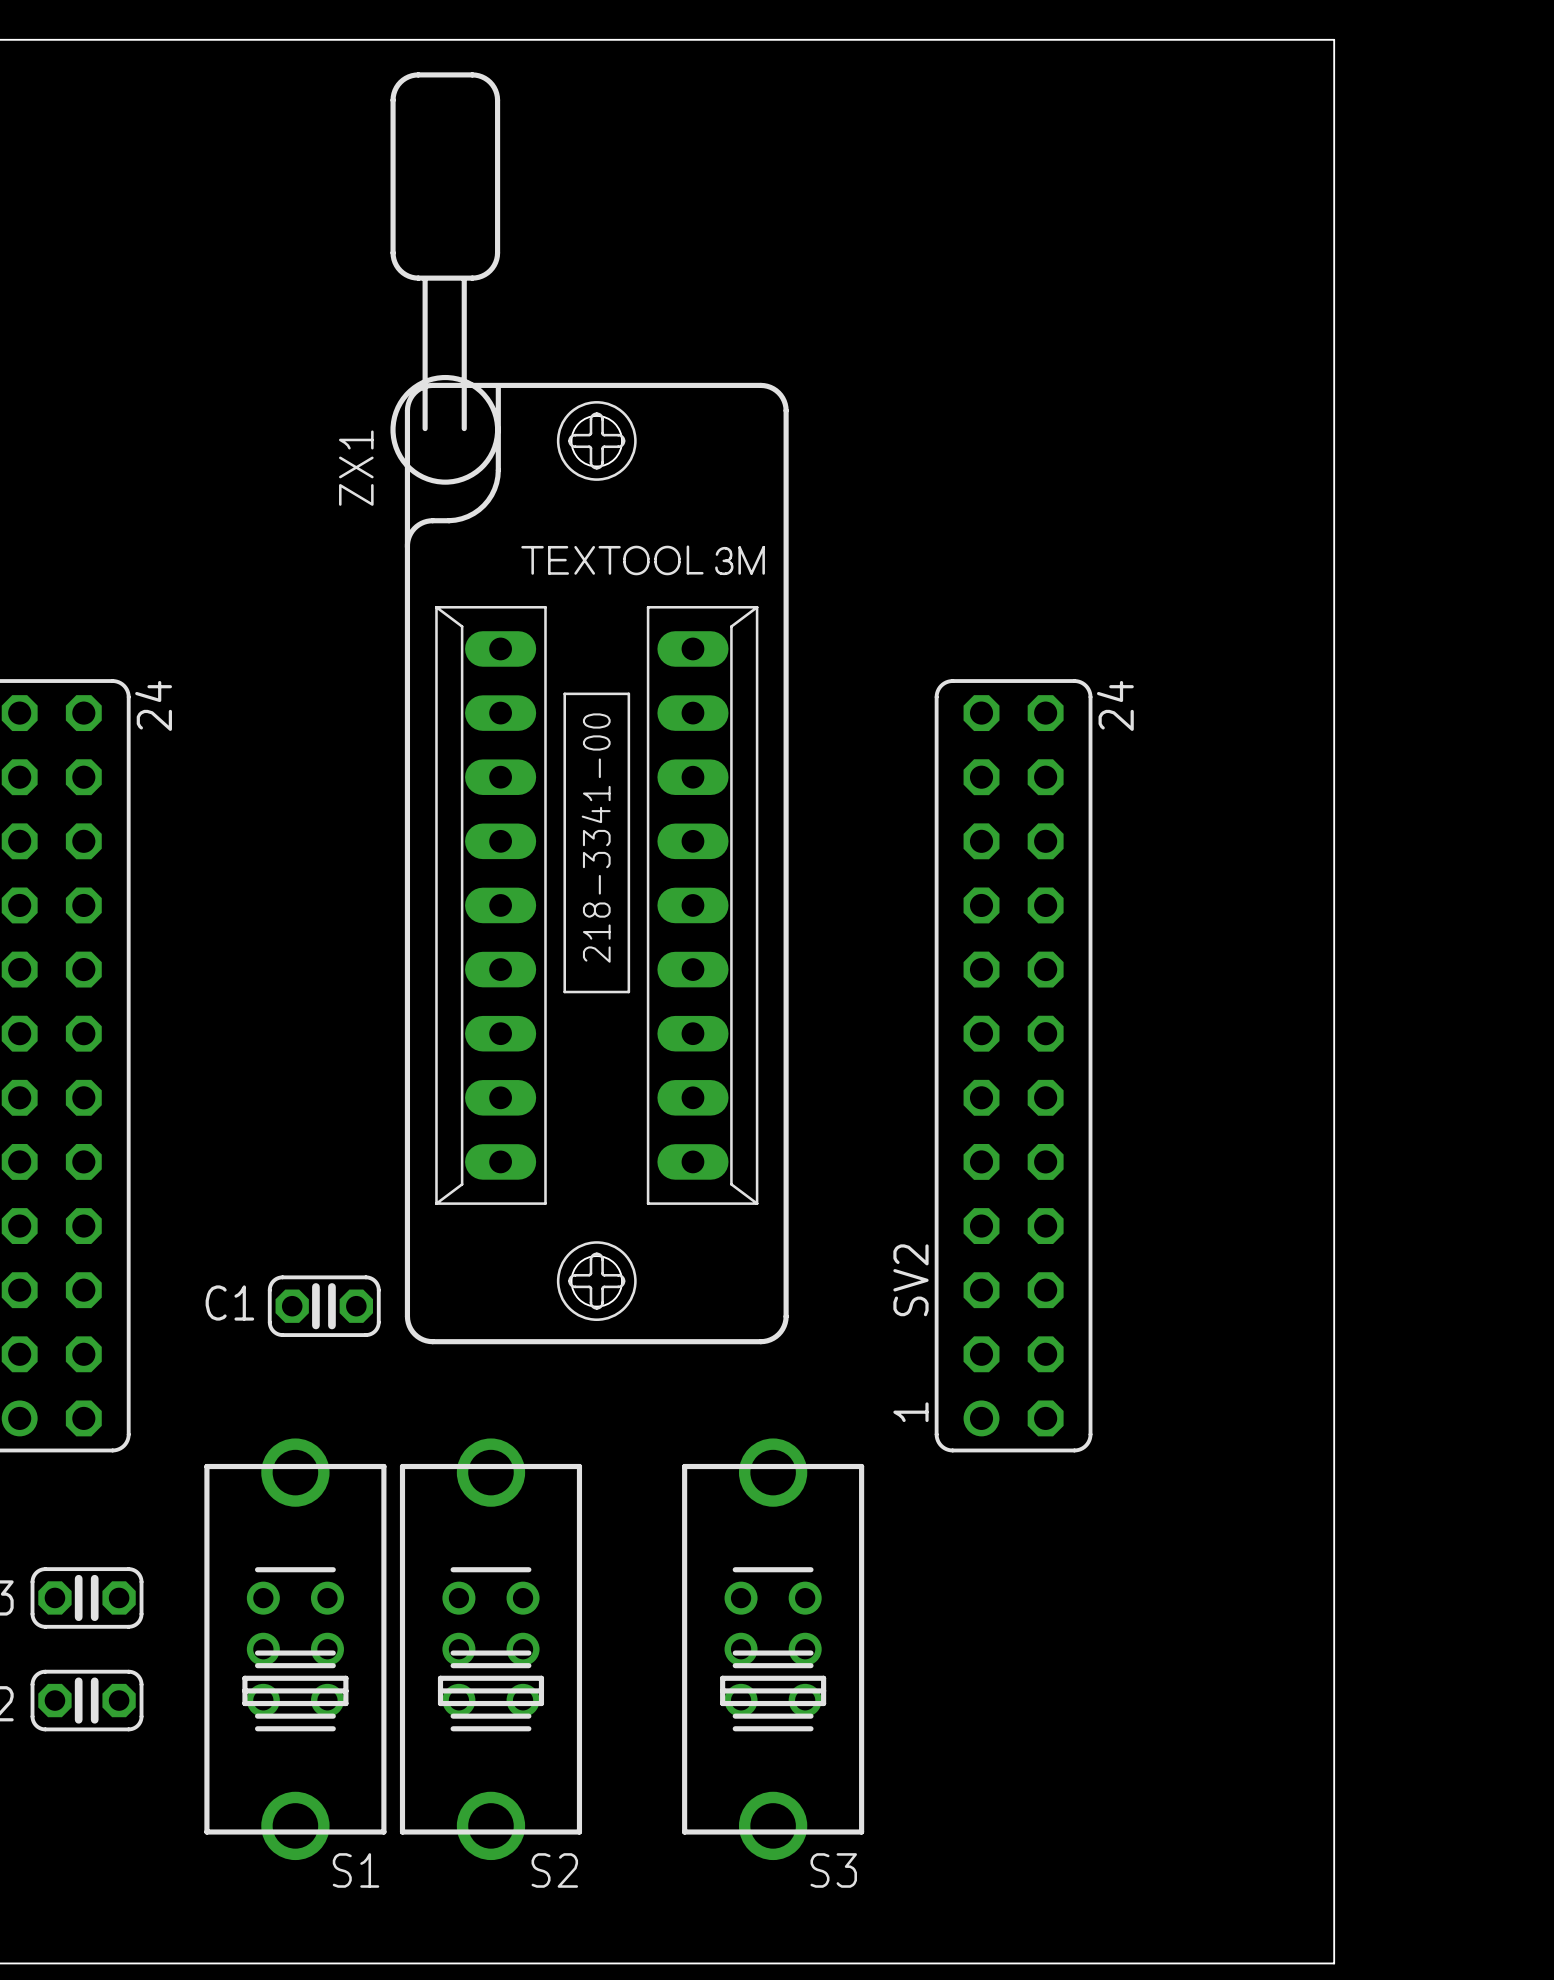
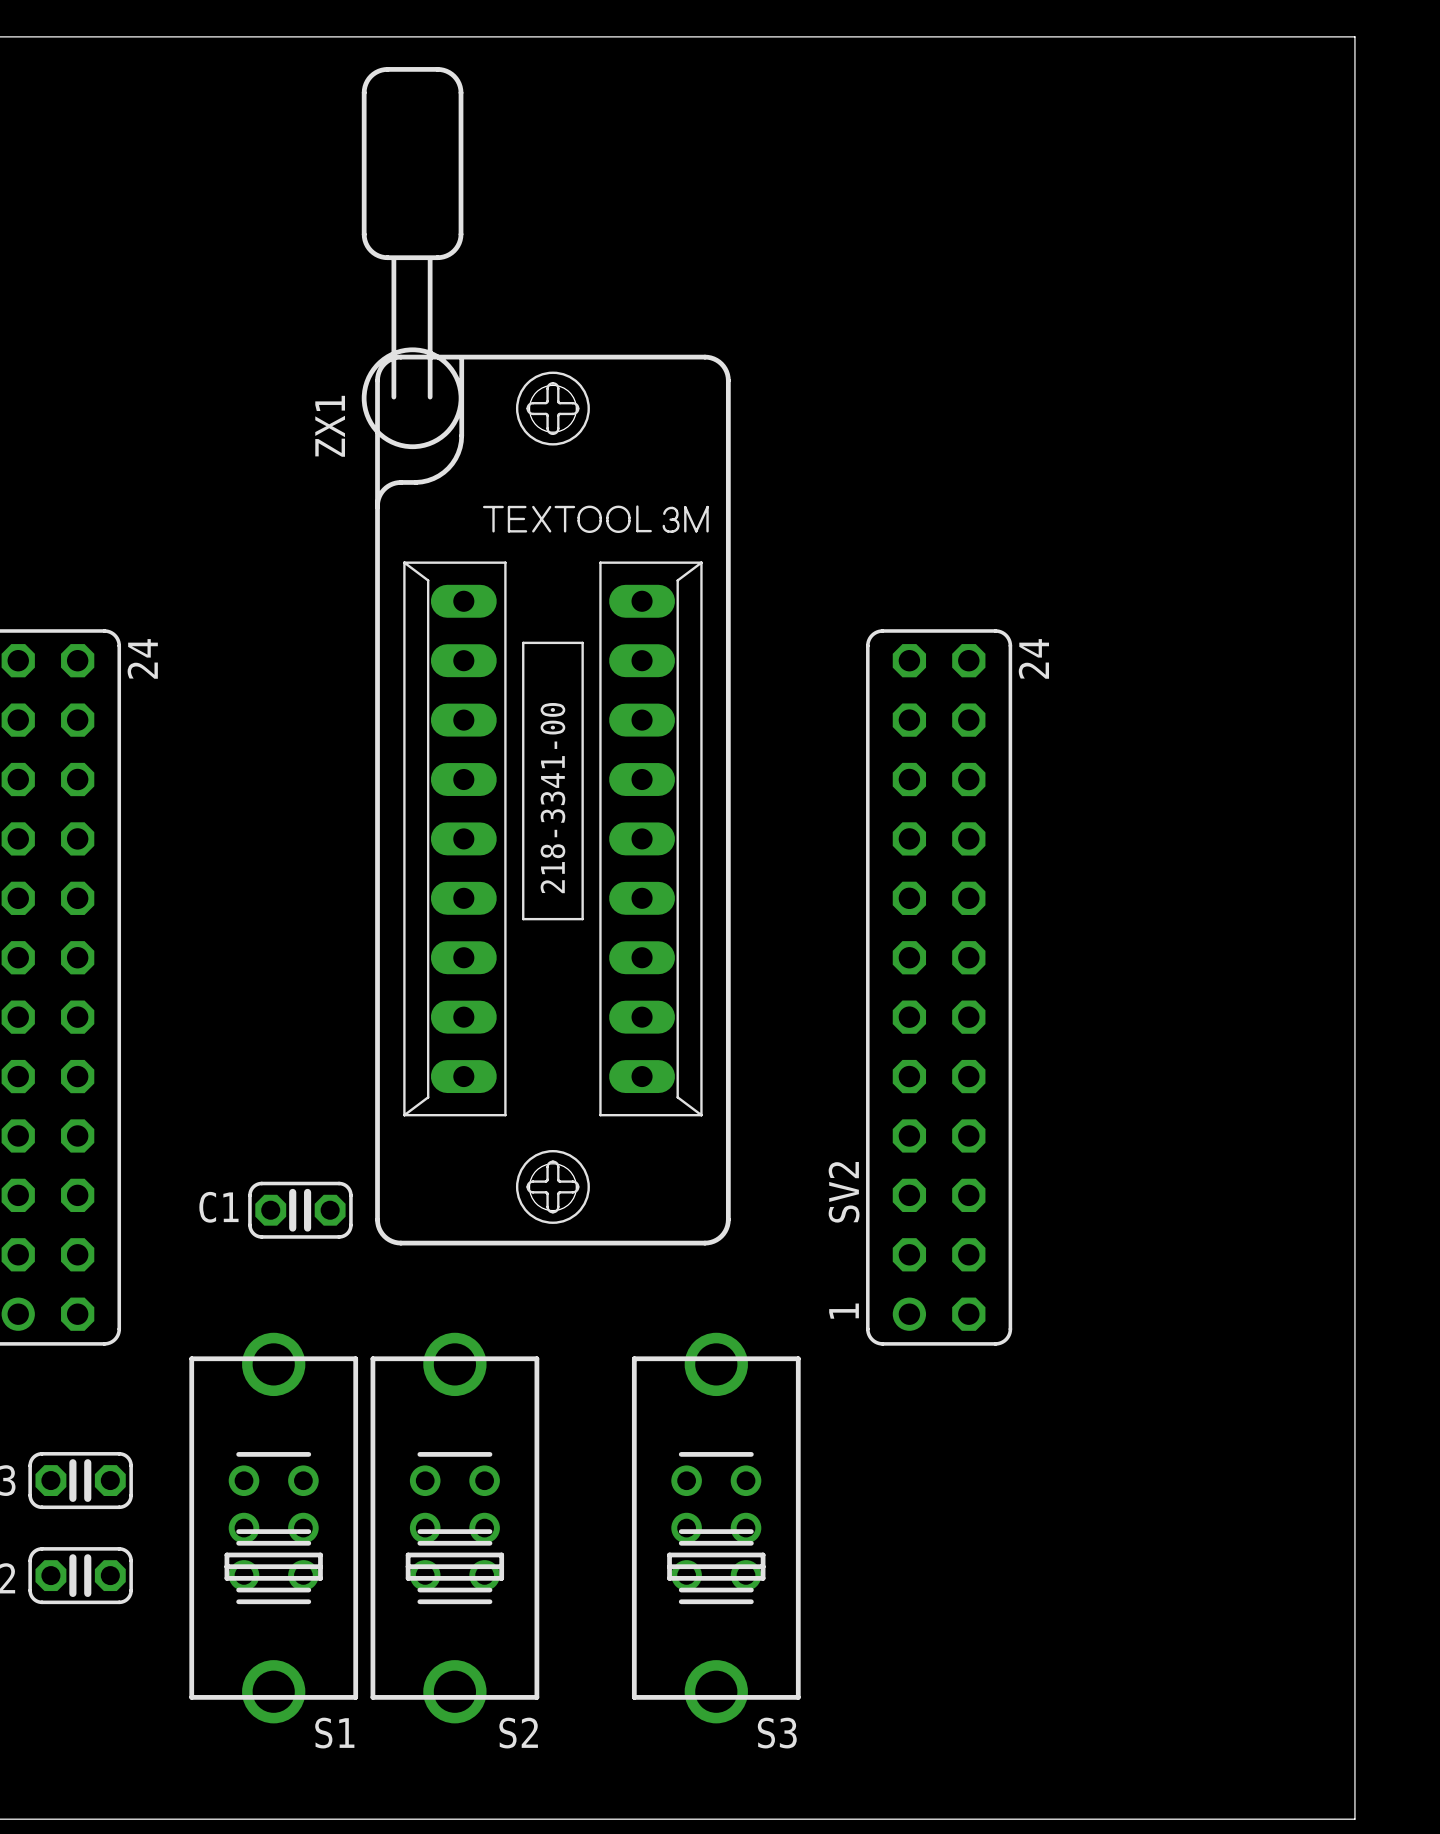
board edge: (1334, 39) (1334, 1963) -> (1236, 36) (1354, 36) (1354, 1819) (1236, 1819)

